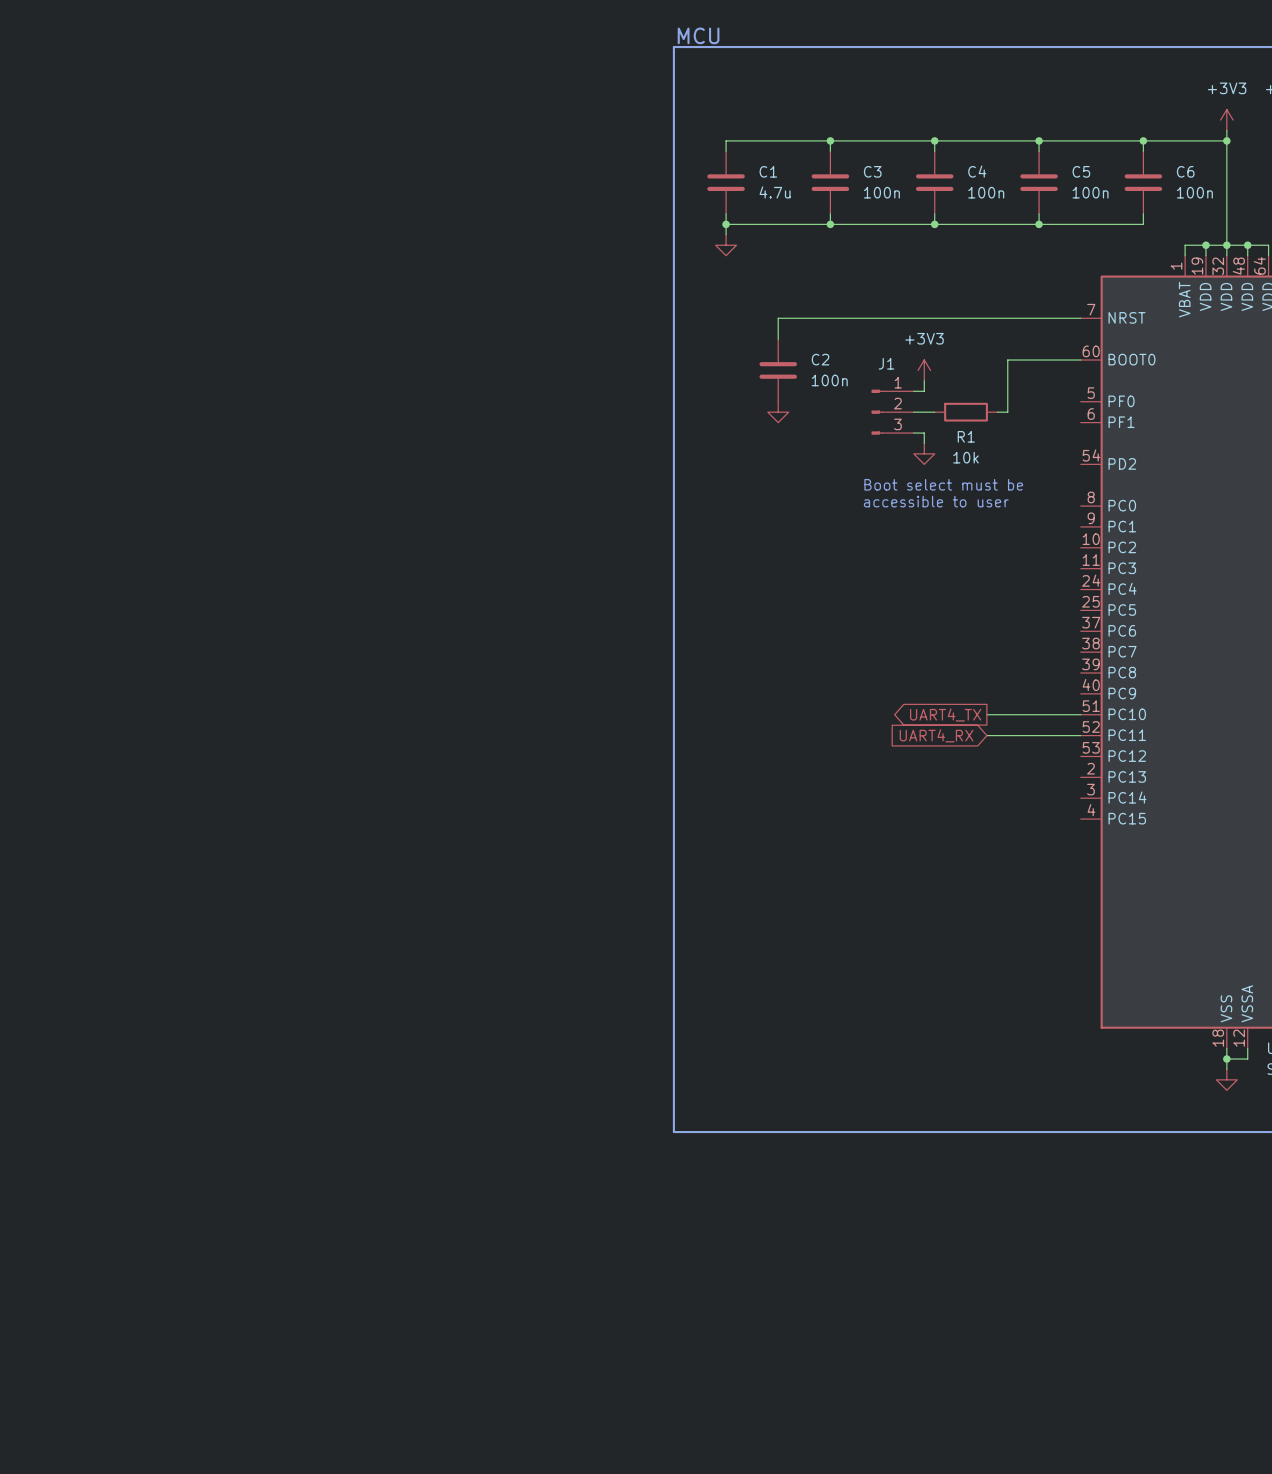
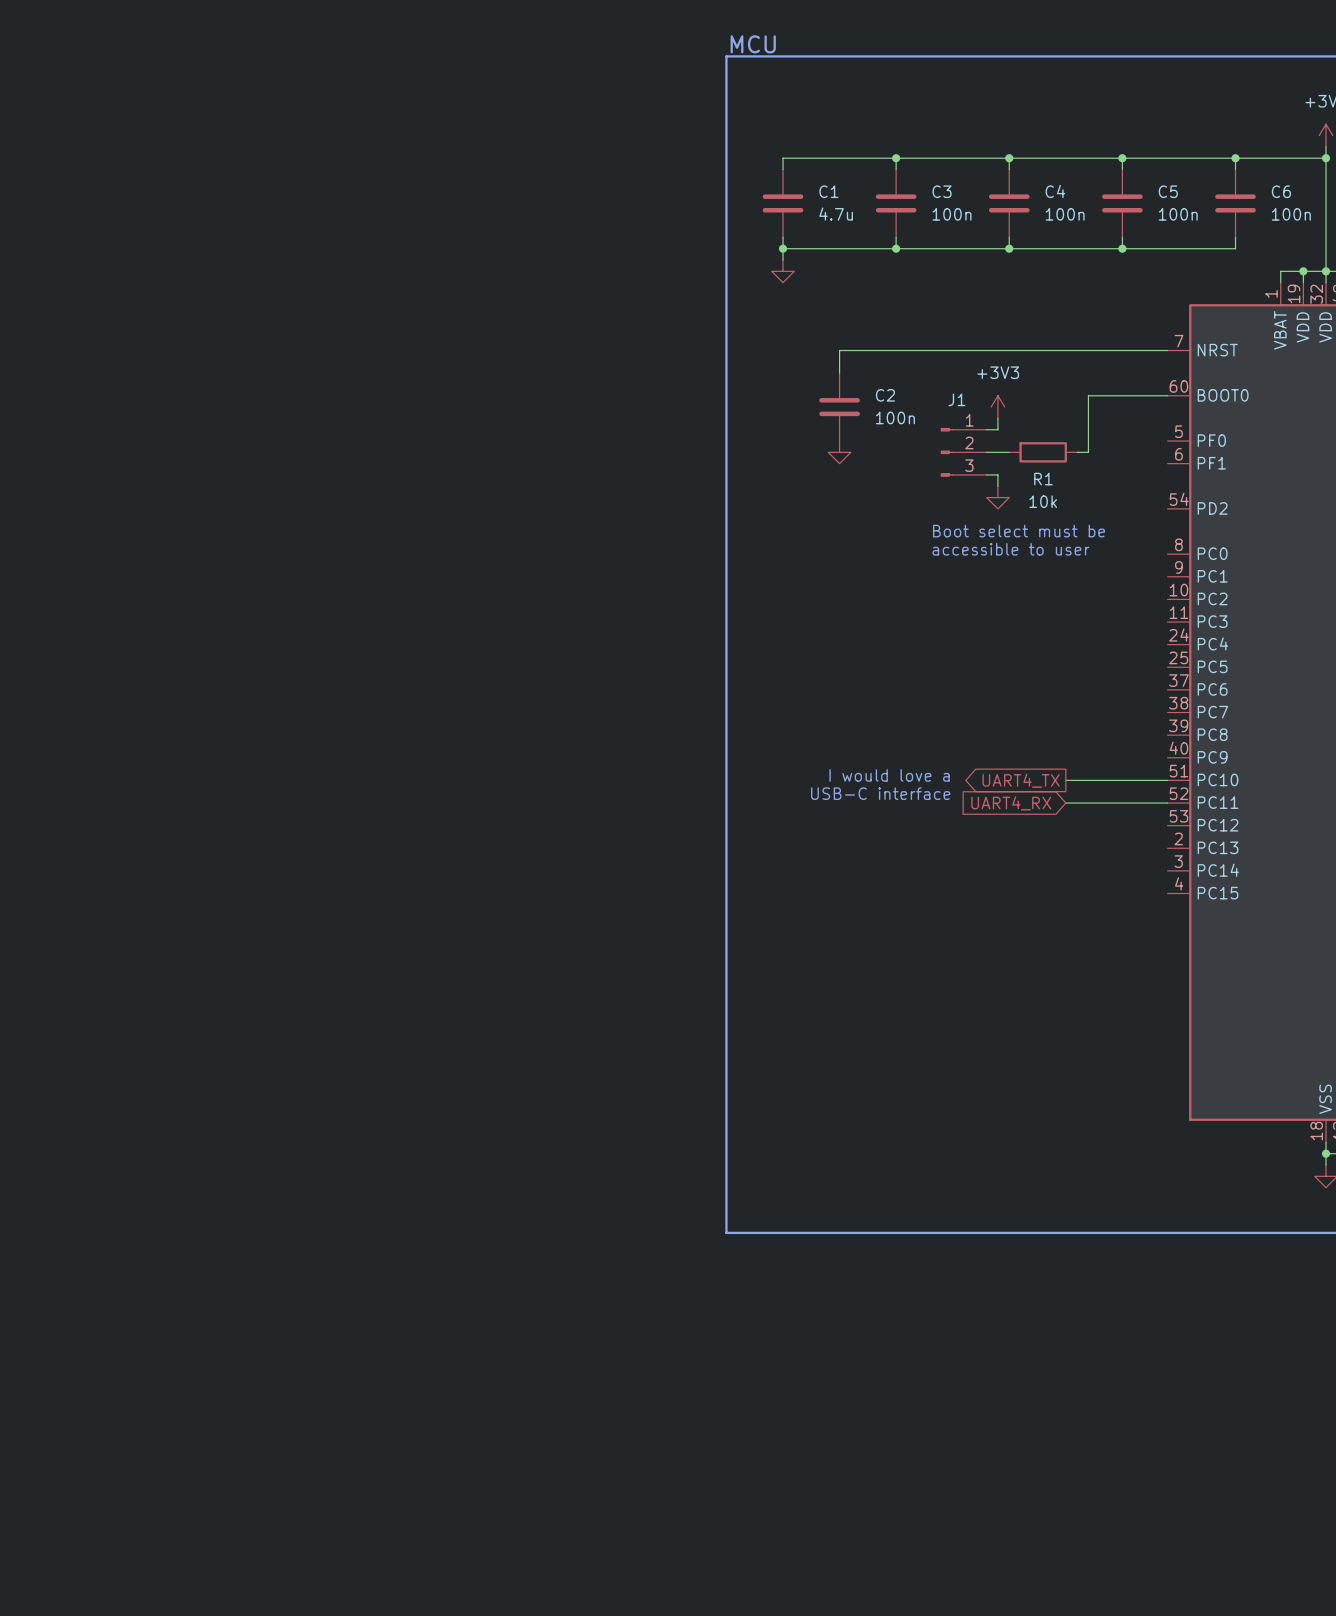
text: none -> I would love a (889, 775)
text: none -> USB-C interface (880, 793)

